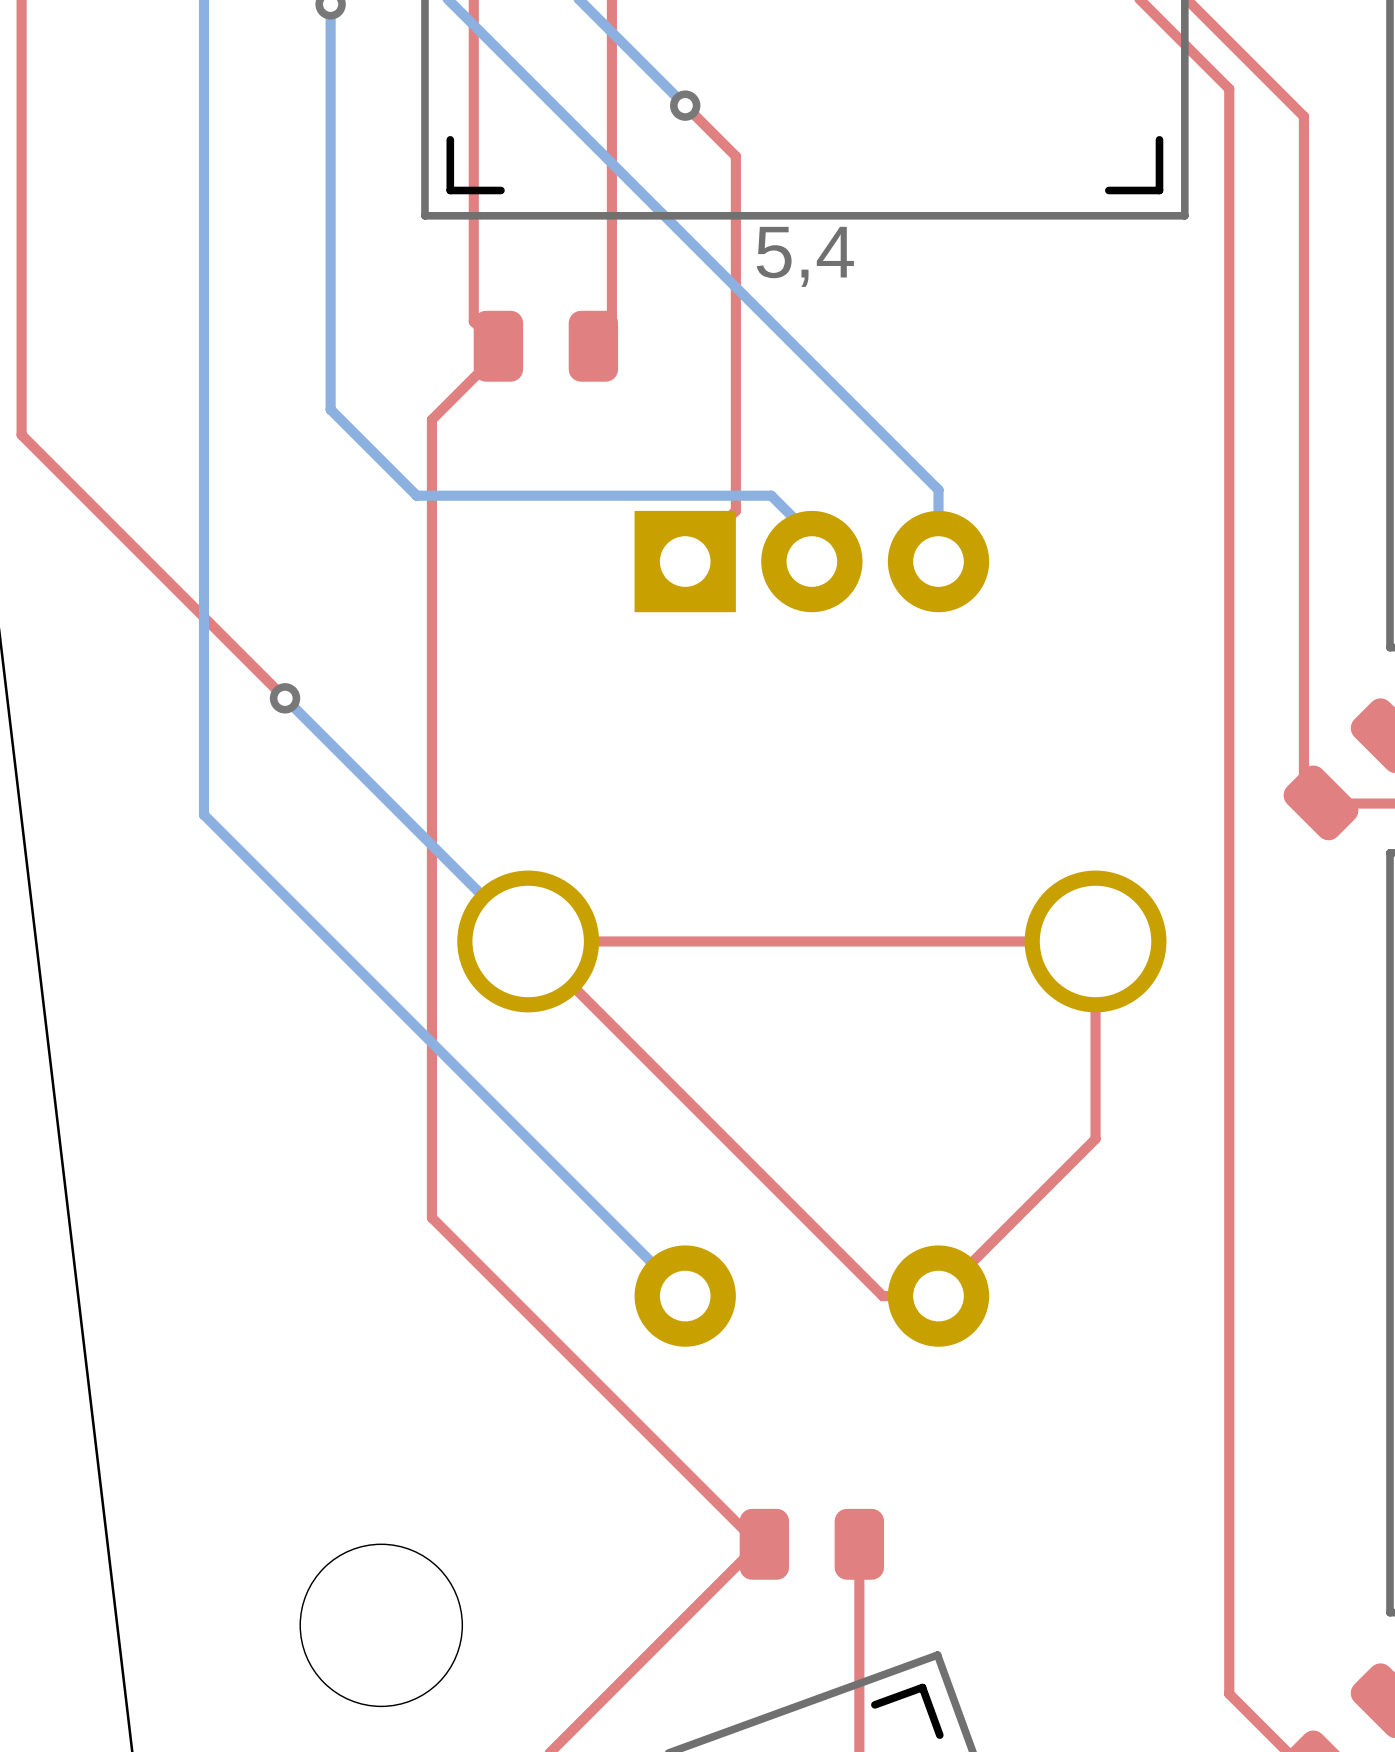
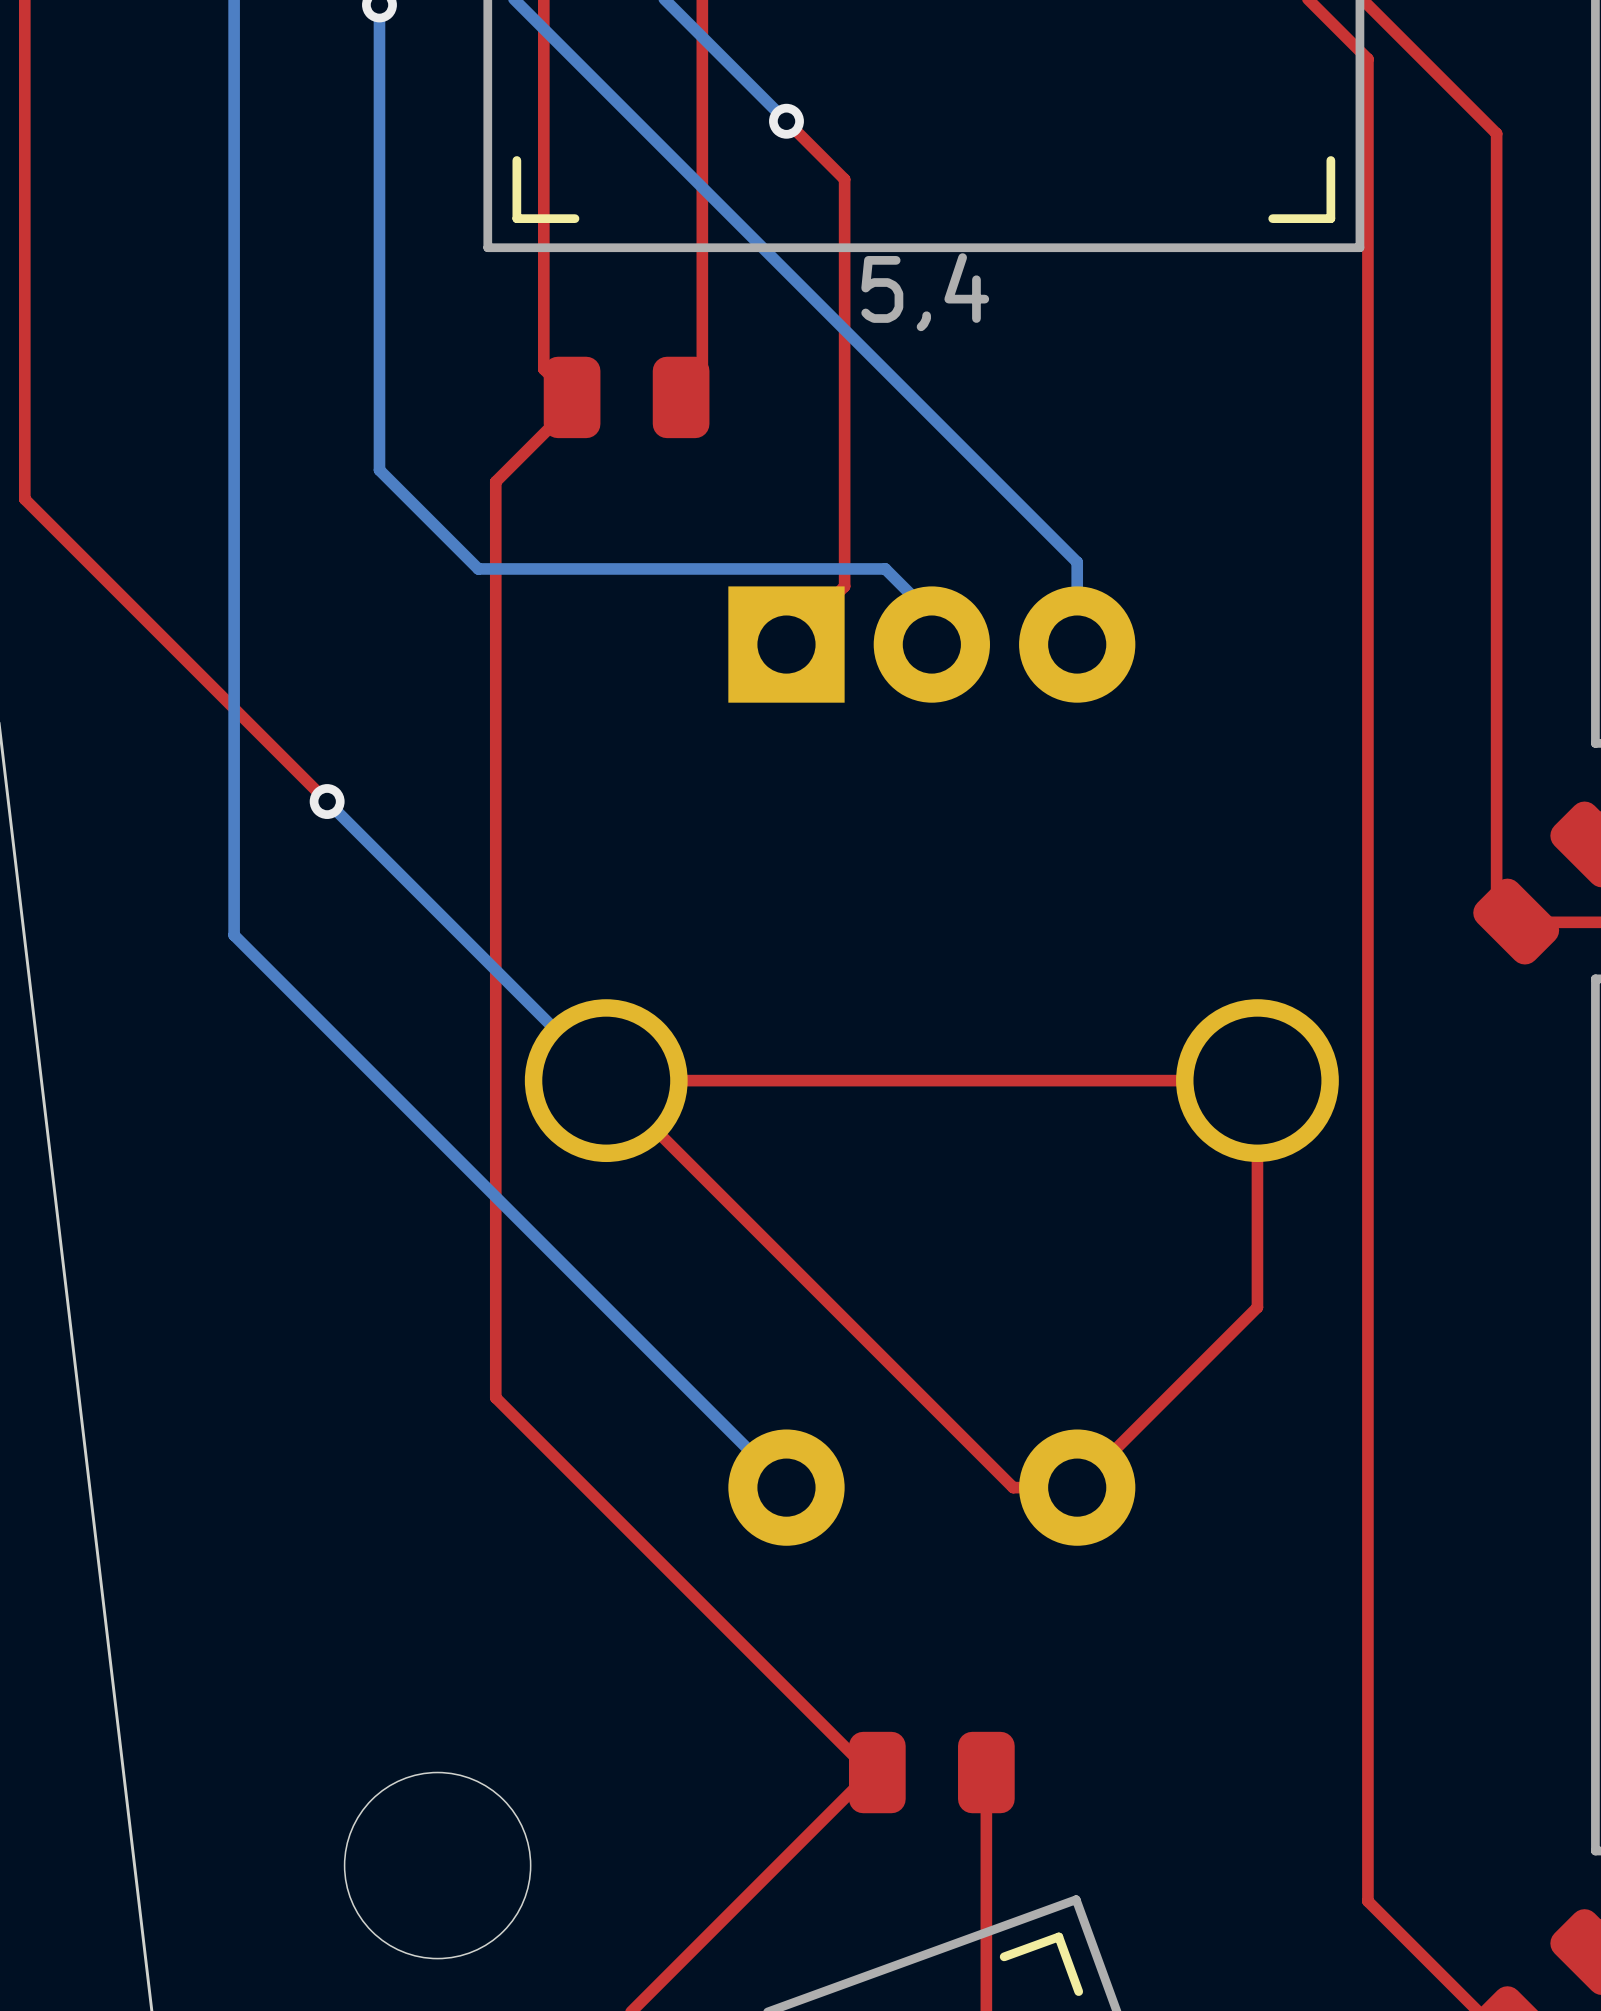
top track: (1191, 51) (1229, 88) (1229, 1693) -> (1367, 59) (1367, 1901) (1410, 1944)

